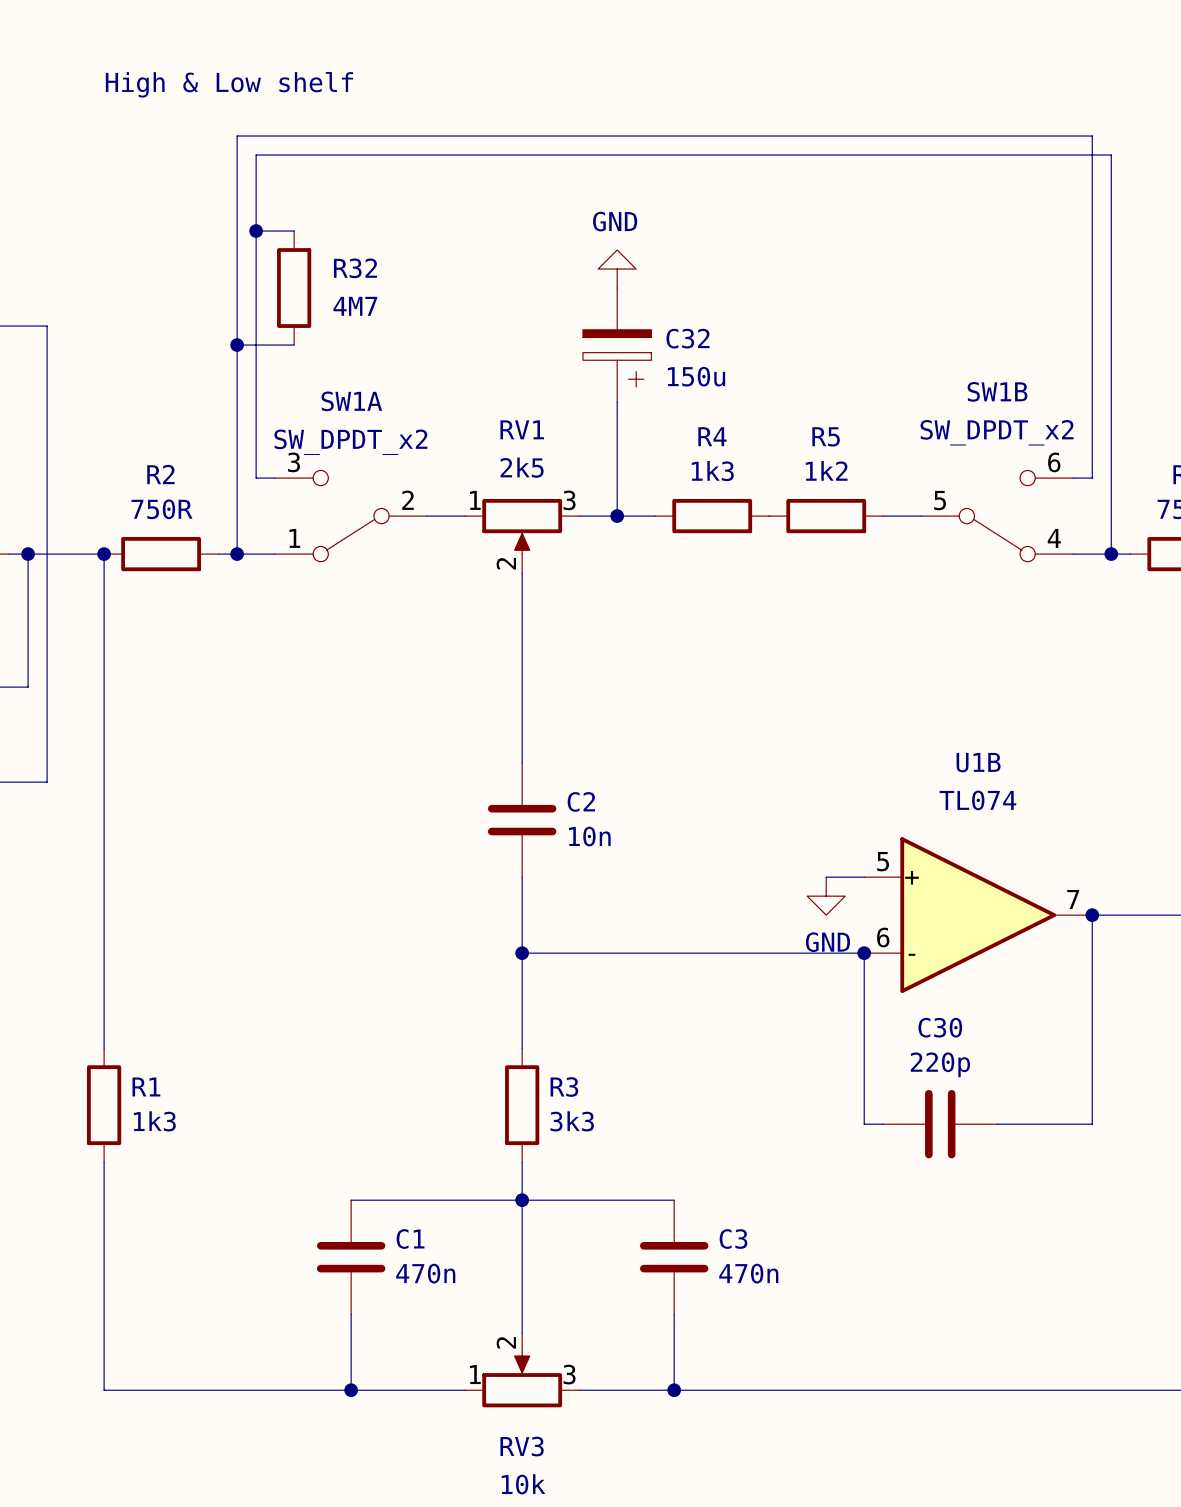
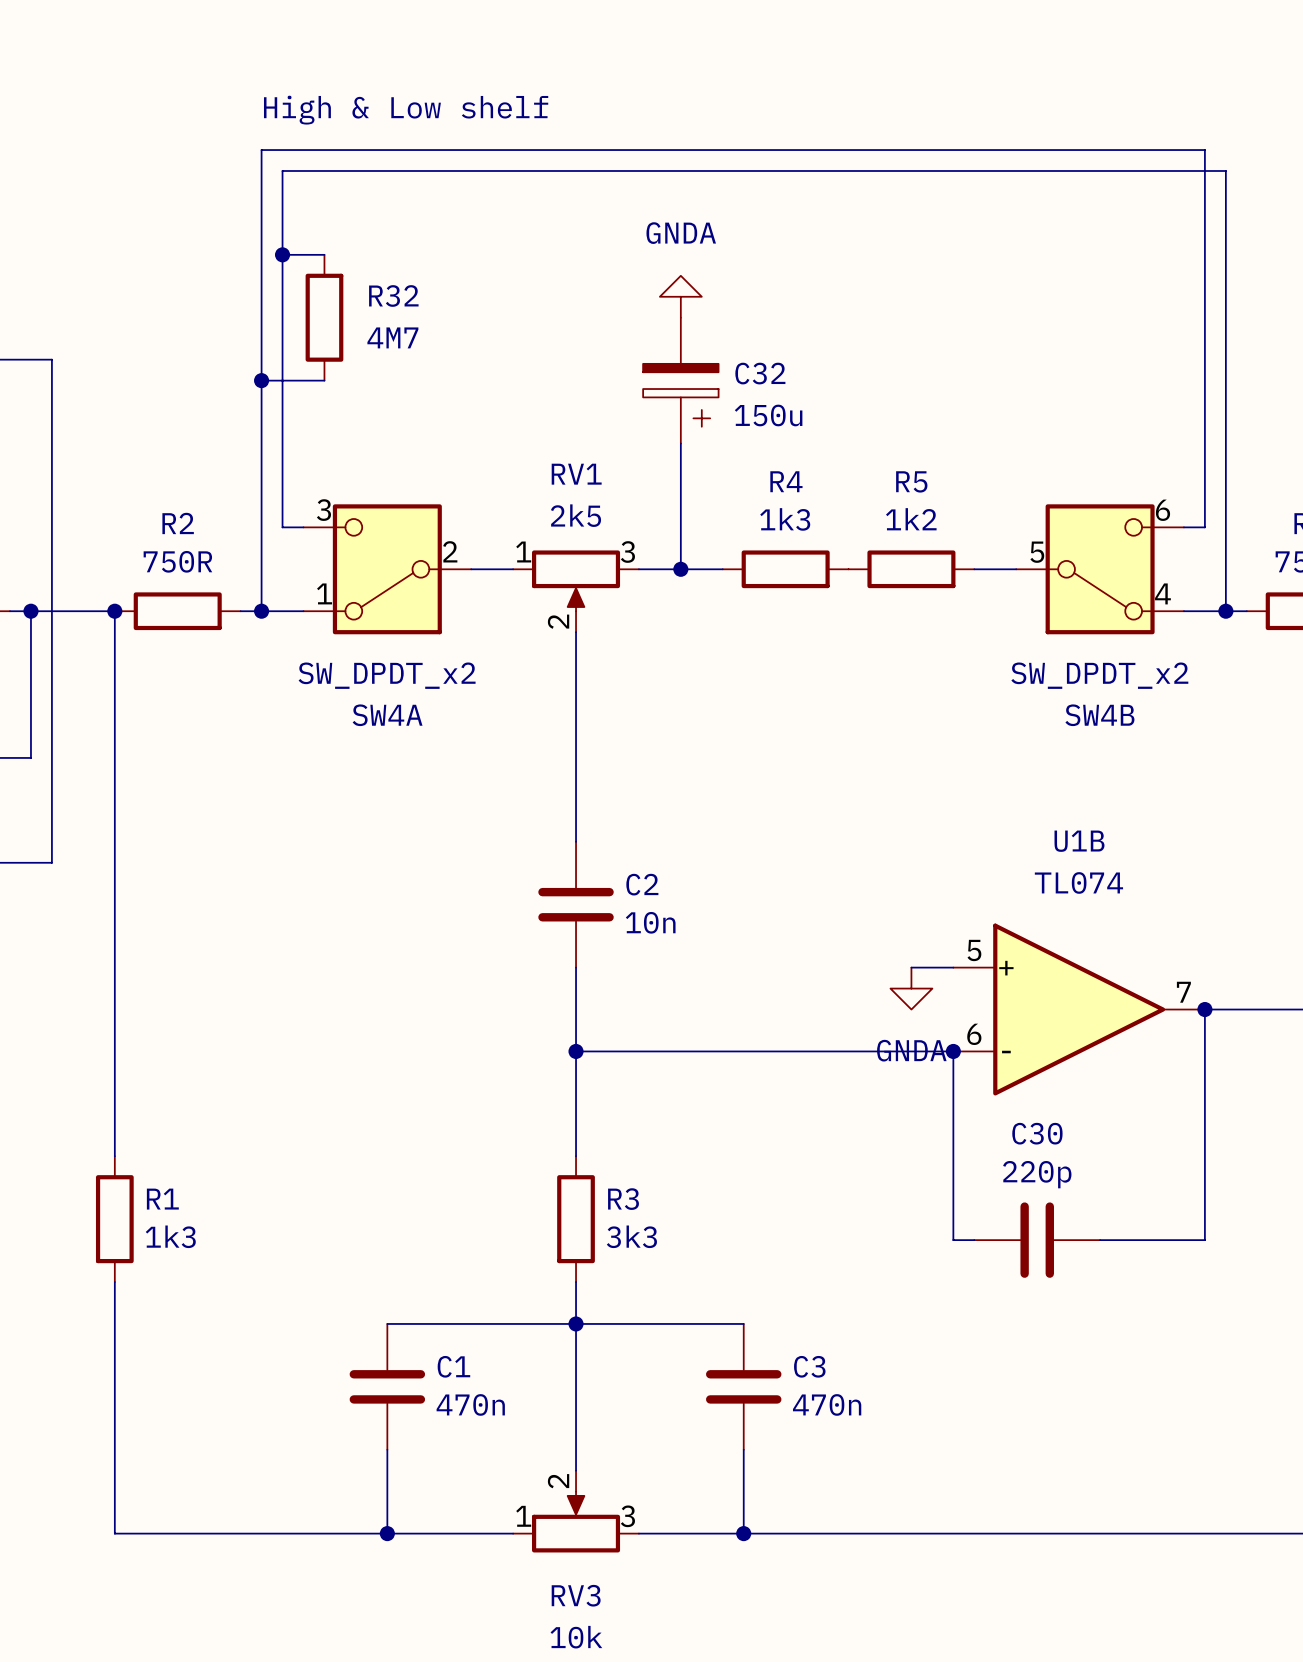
text position: High & Low shelf (229, 84) -> High & Low shelf (406, 110)
power symbol: GND (617, 269) -> GNDA (680, 296)
SW1A: SW_DPDT_x2 (351, 516) -> none
SW4A: none -> SW_DPDT_x2 (387, 569)
SW1B: SW_DPDT_x2 (997, 516) -> none
SW4B: none -> SW_DPDT_x2 (1100, 569)
power symbol: GND (826, 896) -> GNDA (911, 988)

